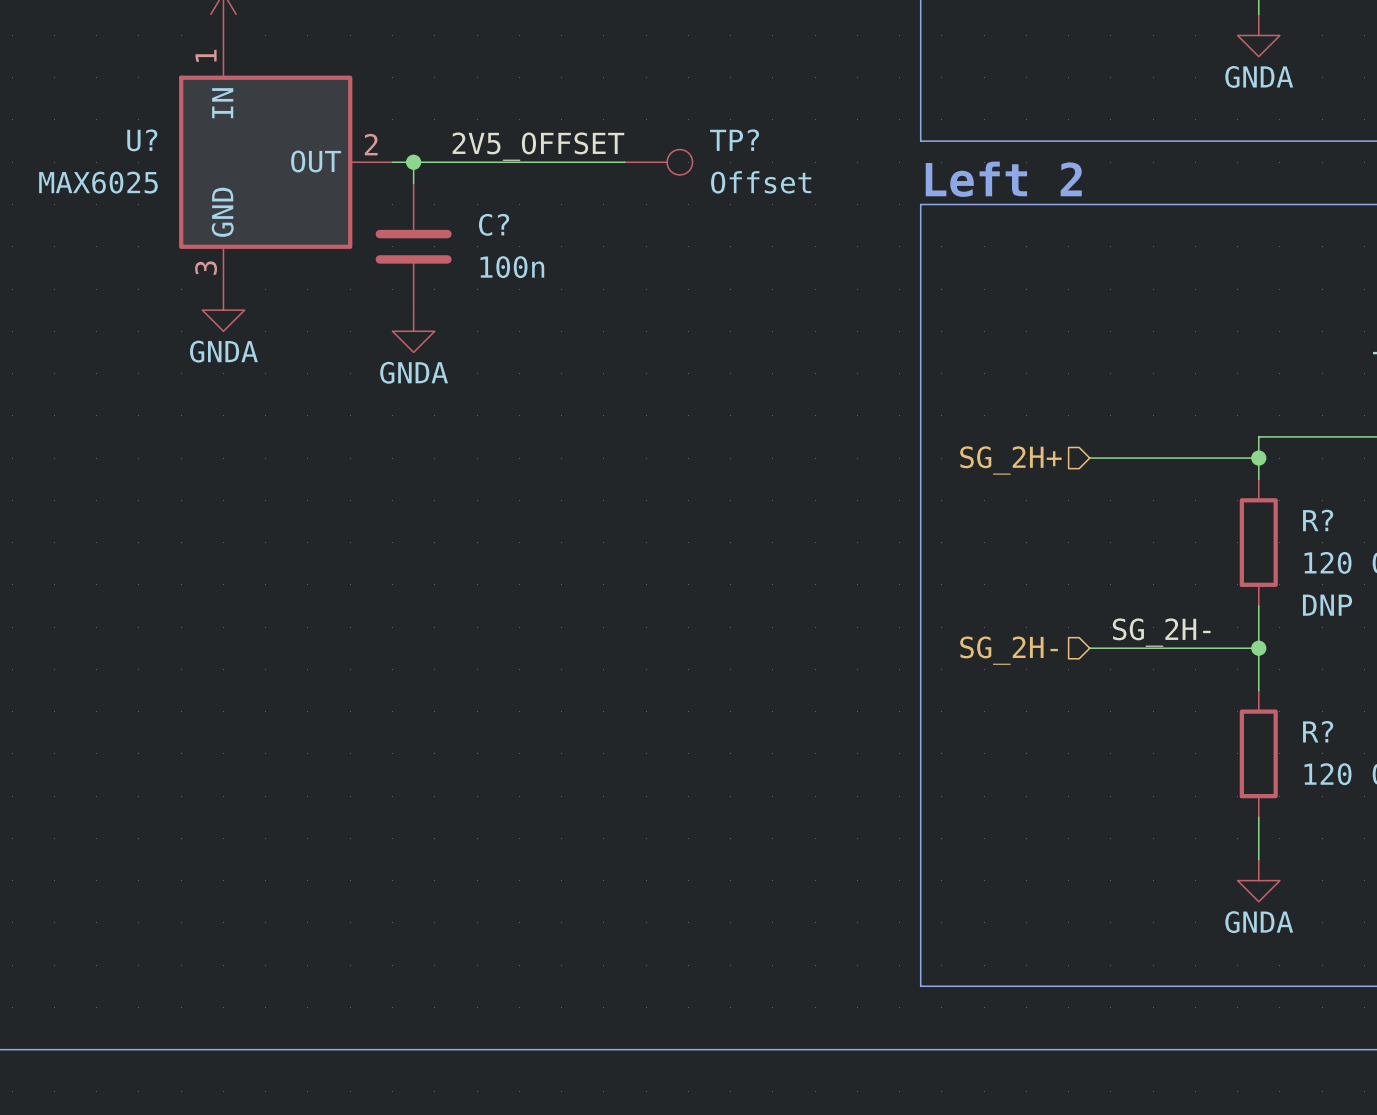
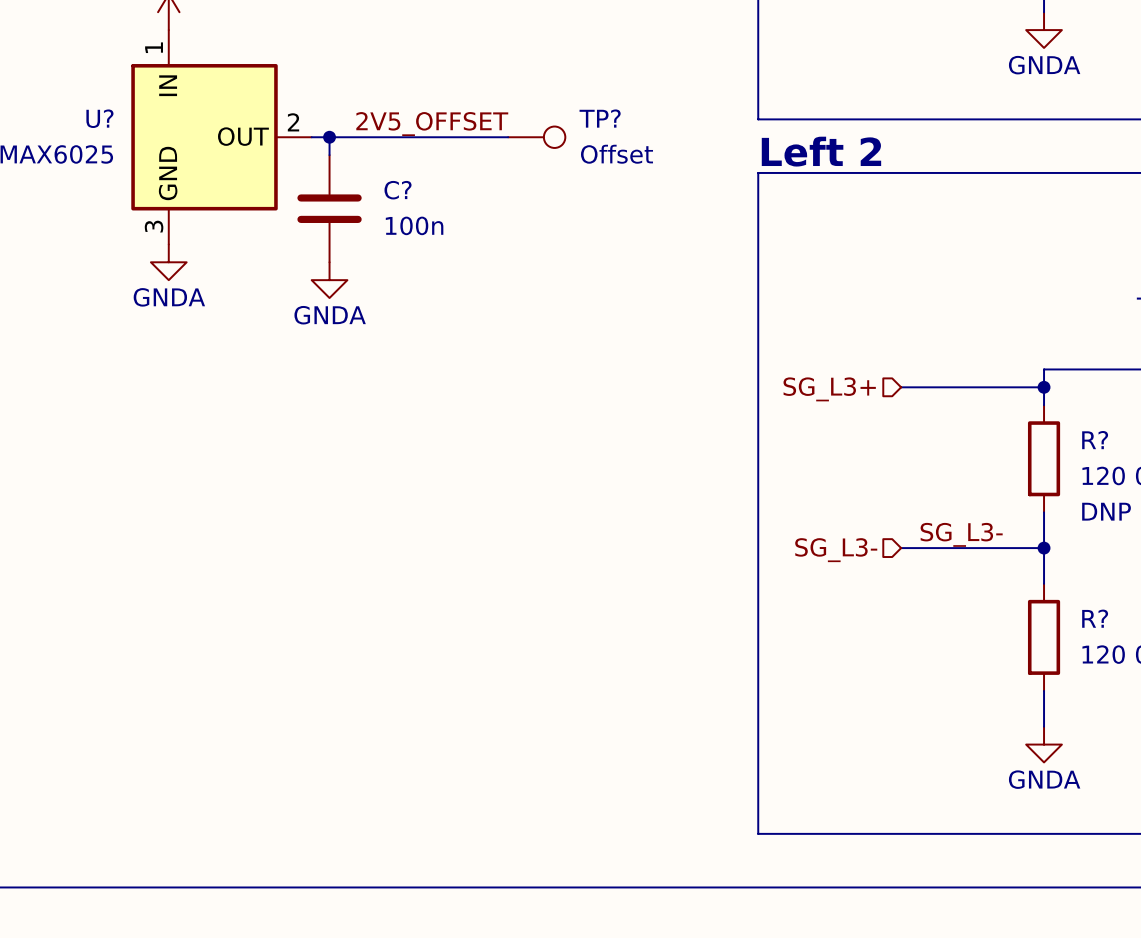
hierarchical label: SG_2H+ (1010, 460) -> SG_L3+ (829, 389)
label: SG_2H- (1161, 632) -> SG_L3- (961, 534)
hierarchical label: SG_2H- (1009, 650) -> SG_L3- (836, 550)

